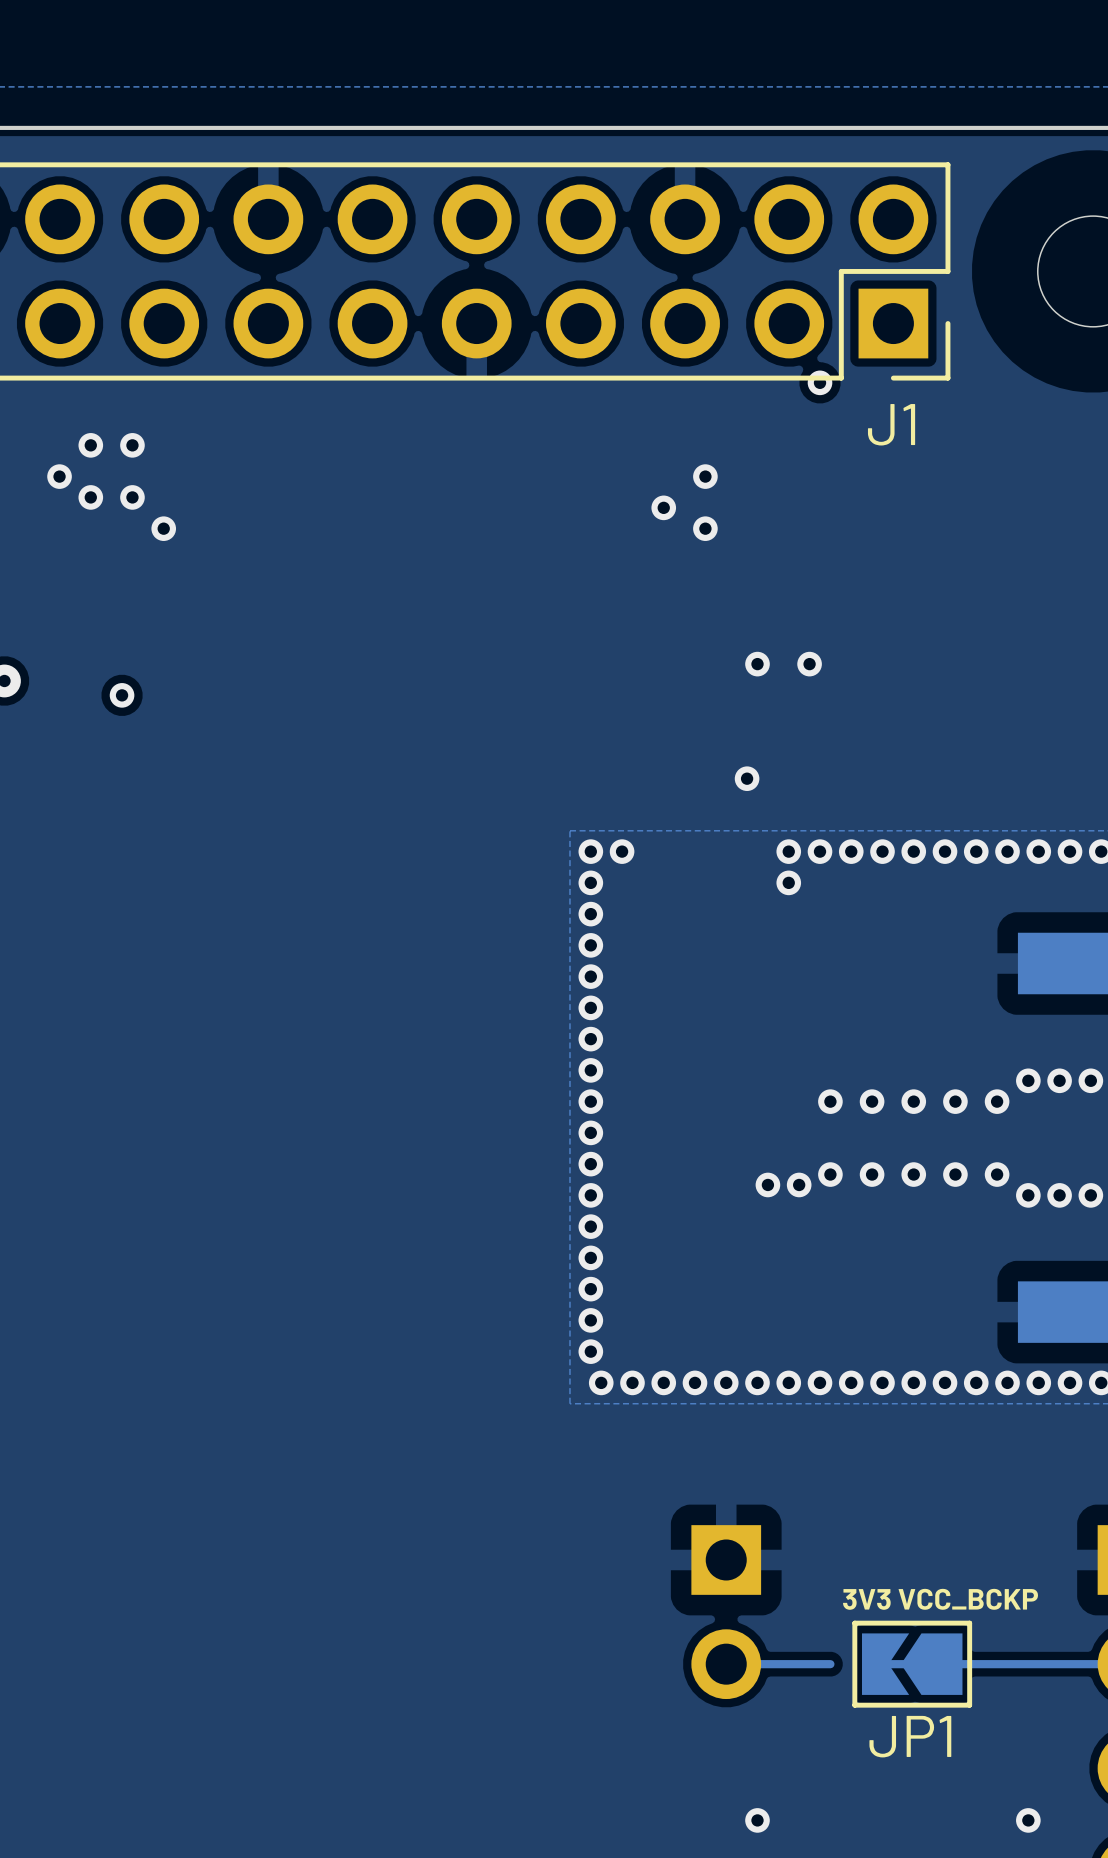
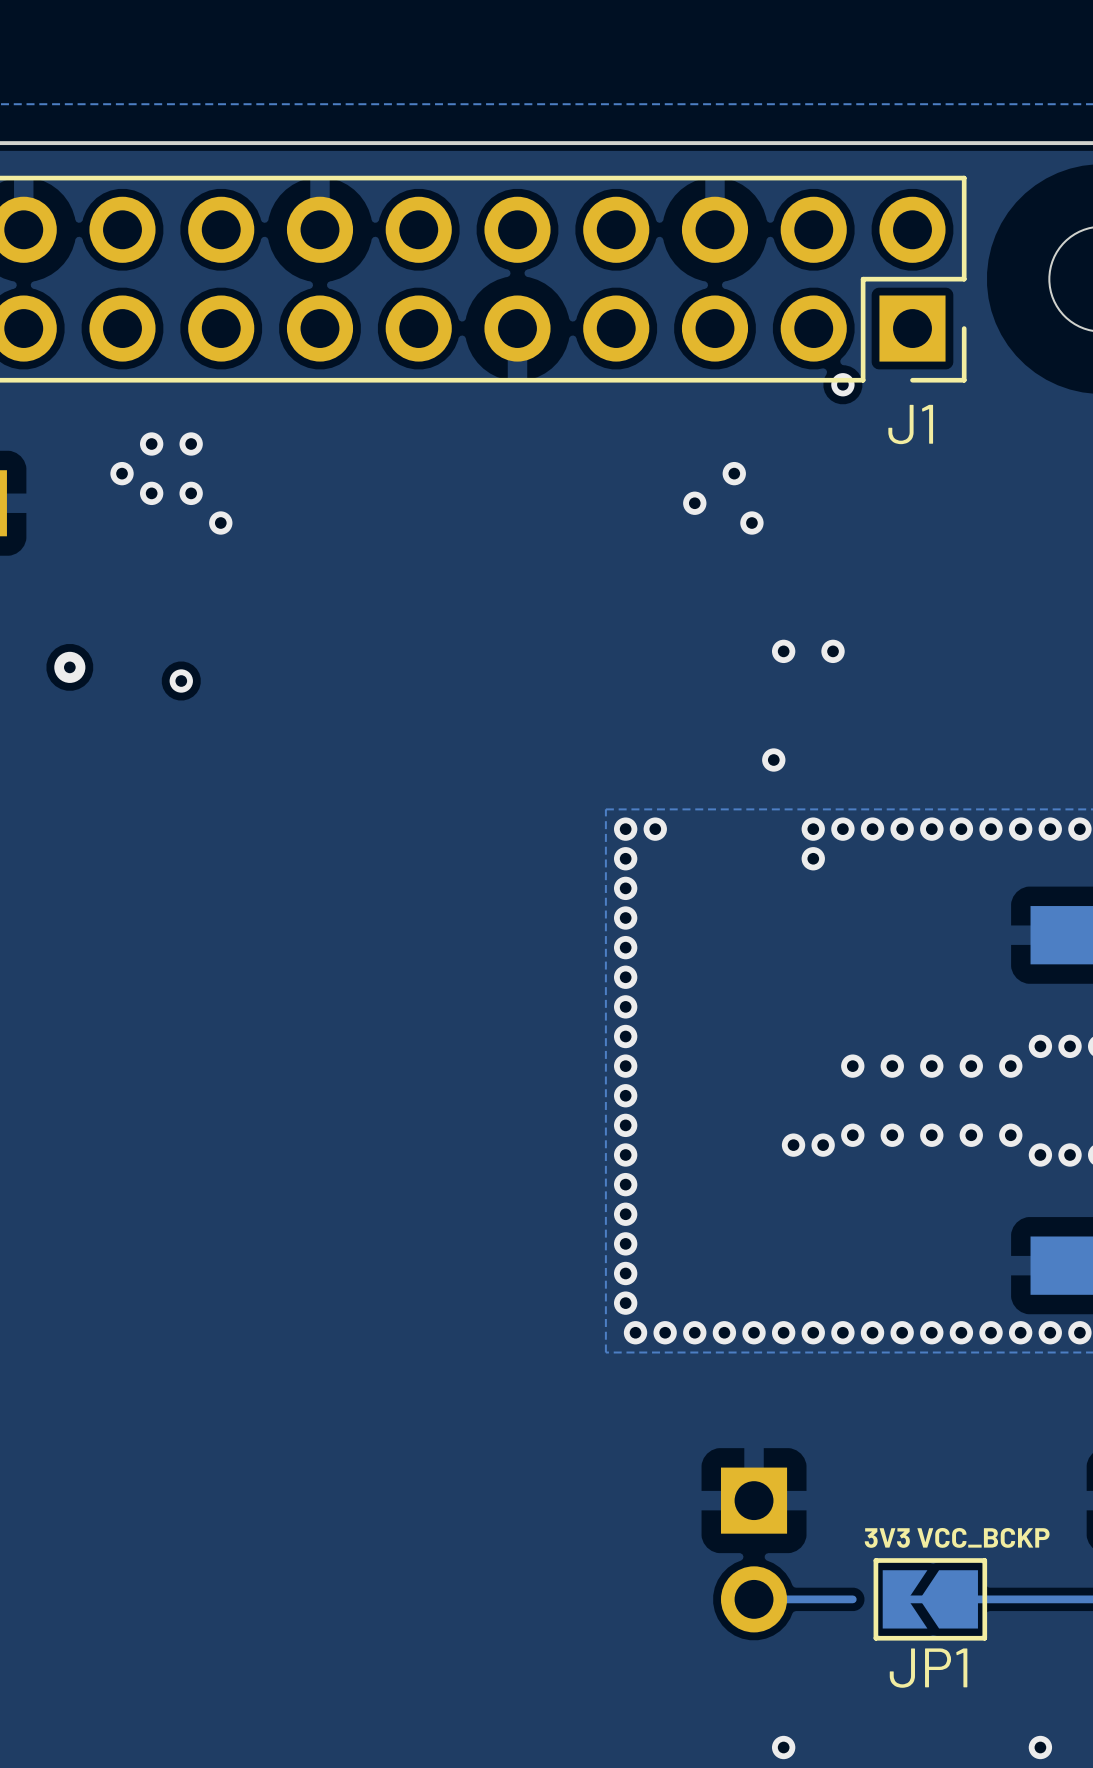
via position: (705, 528) -> (751, 523)

